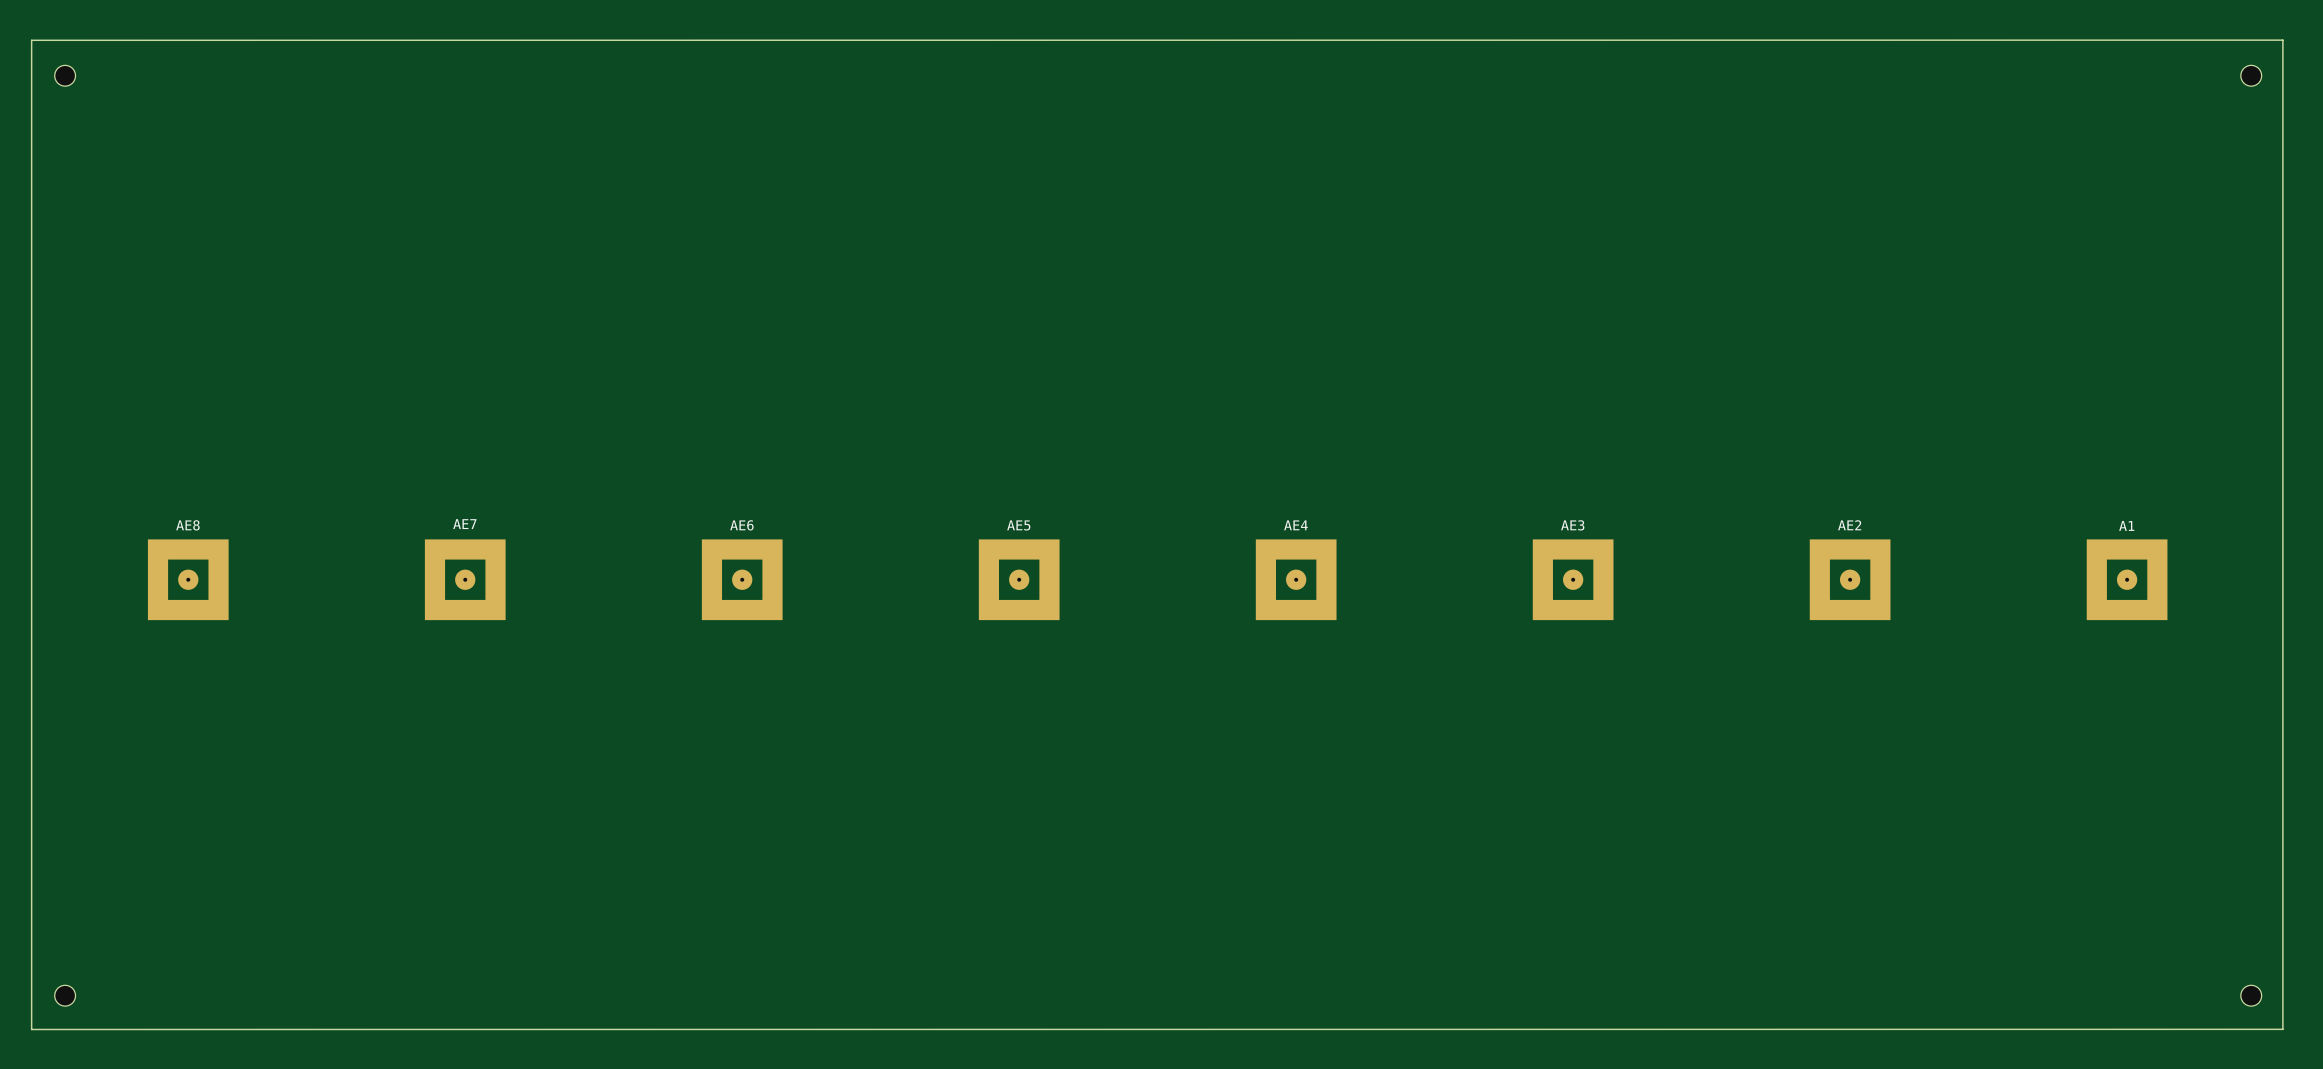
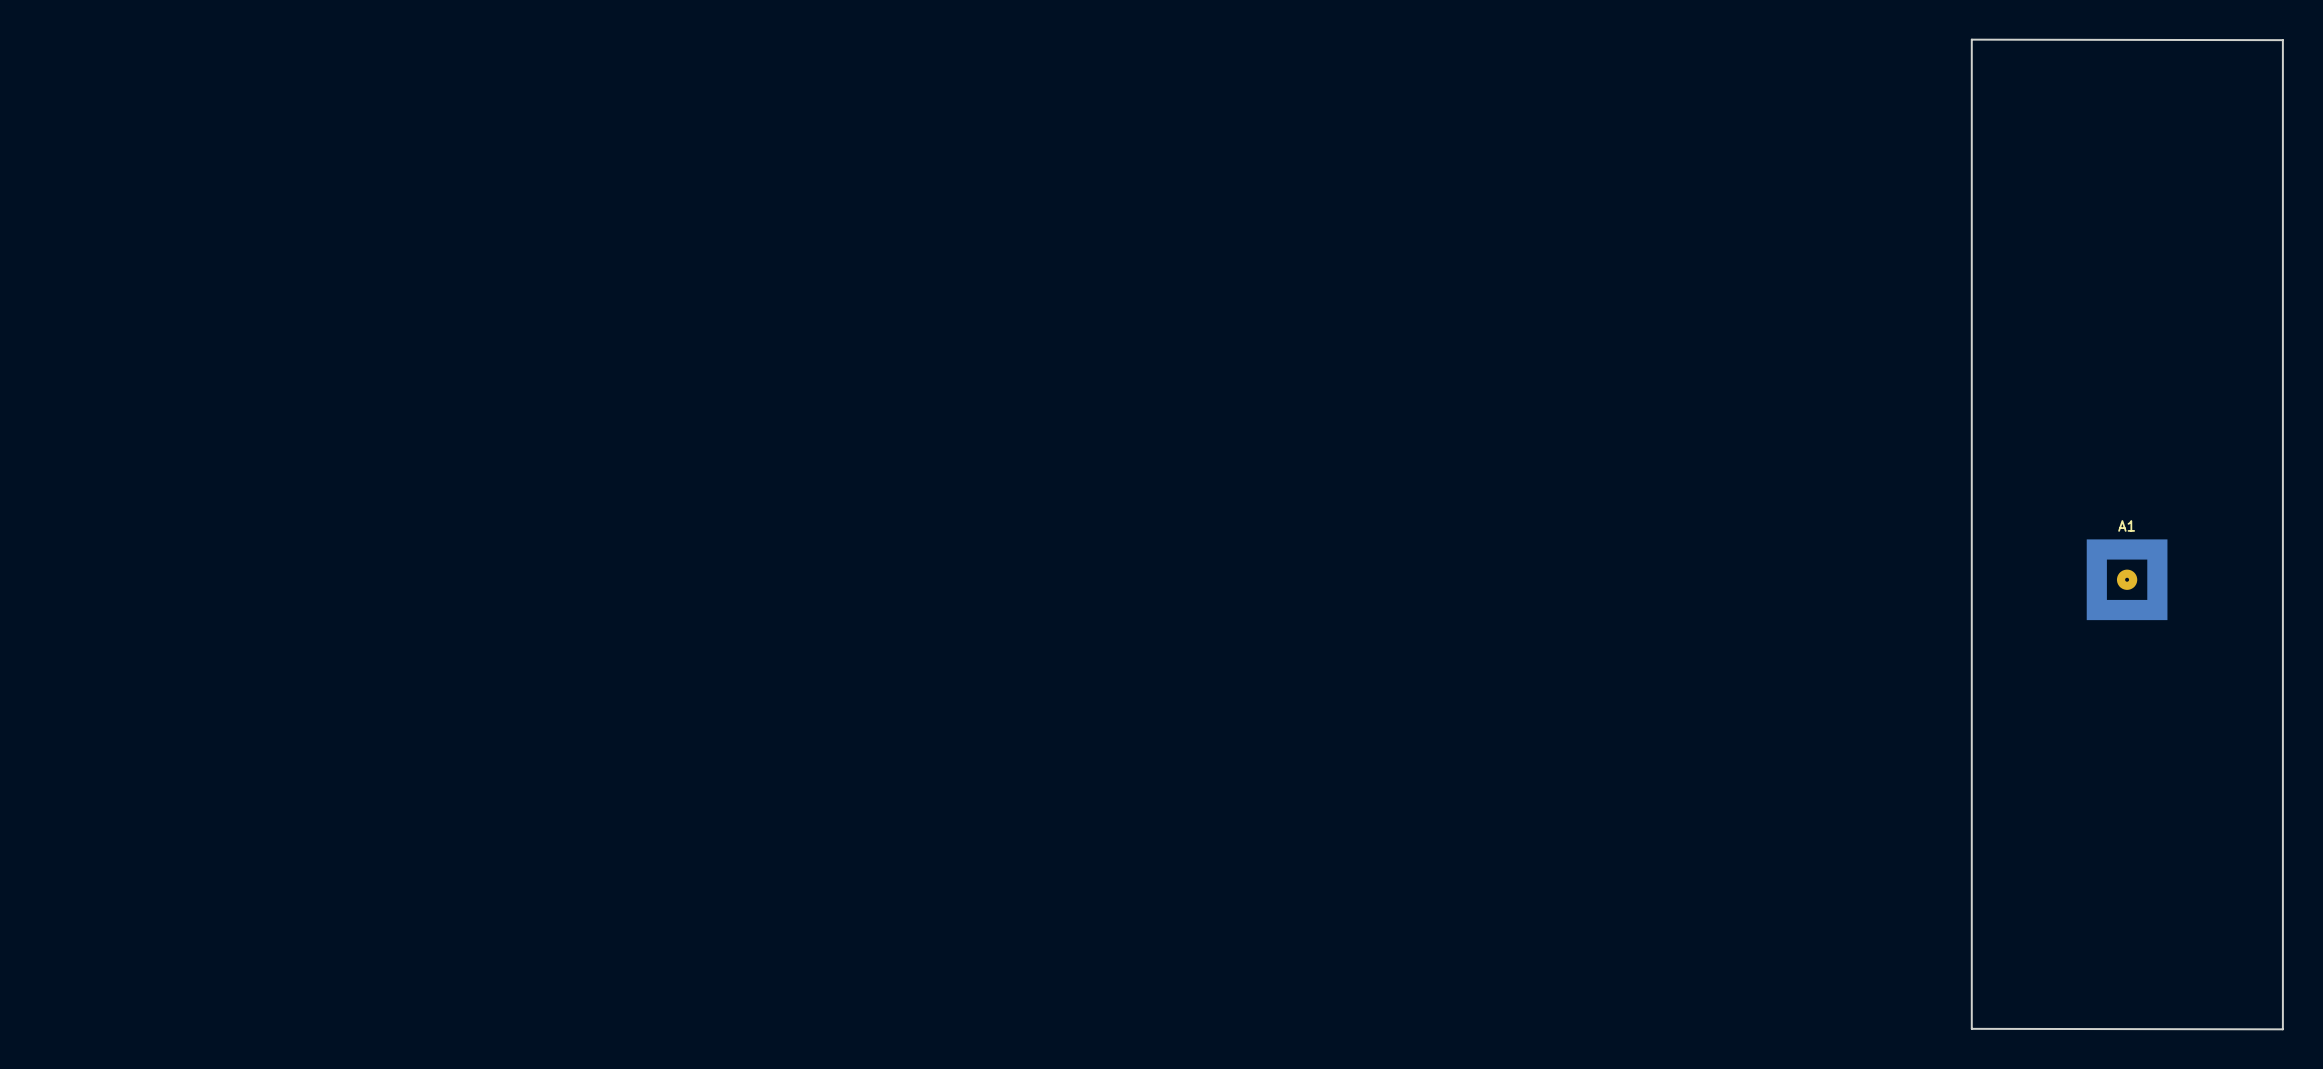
board edge: (2282, 40) (31, 40) (31, 1029) (2282, 1029) -> (2282, 40) (1971, 39) (1971, 1028) (2282, 1029)
part: (65, 75) -> none
part: (2251, 75) -> none
AE8: (188, 579) -> none
AE7: (465, 579) -> none
AE6: (742, 579) -> none
AE5: (1019, 579) -> none
AE4: (1296, 579) -> none
AE3: (1573, 579) -> none
AE2: (1850, 579) -> none
part: (65, 995) -> none
part: (2251, 995) -> none

